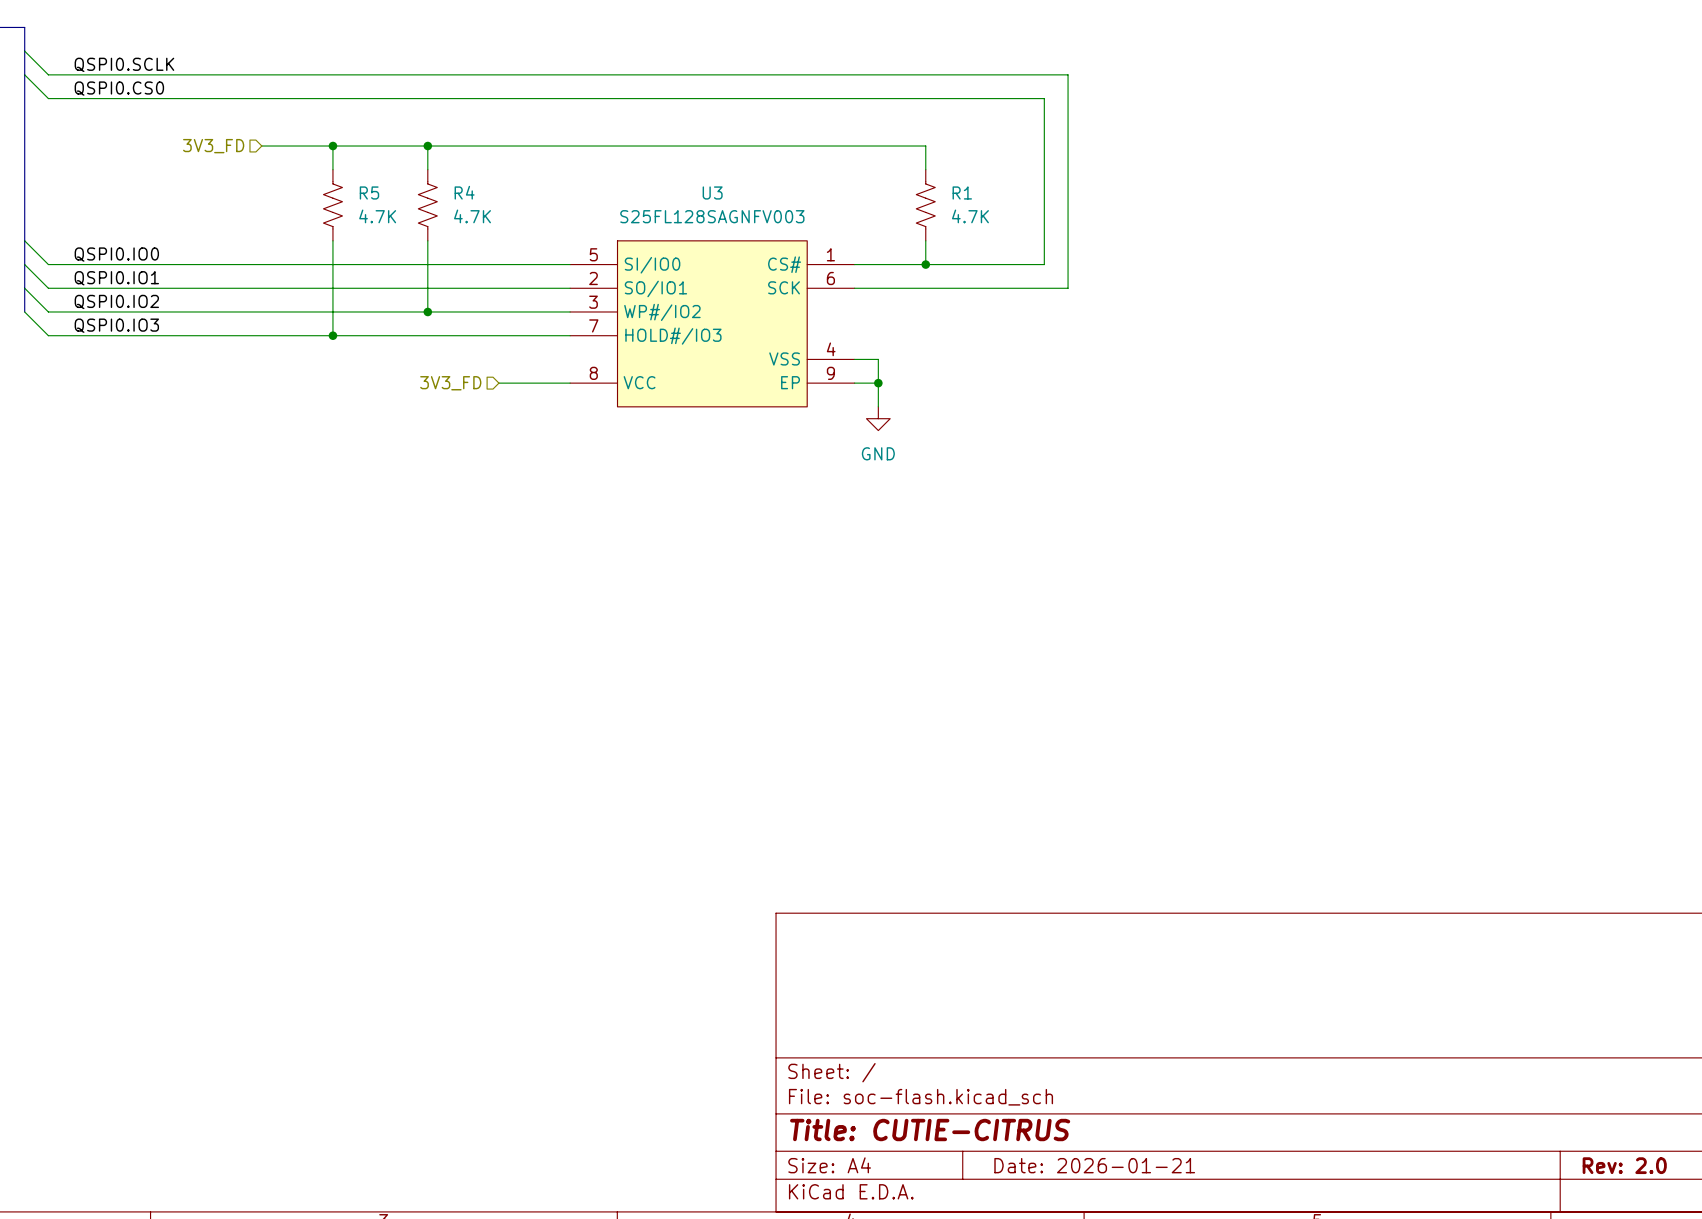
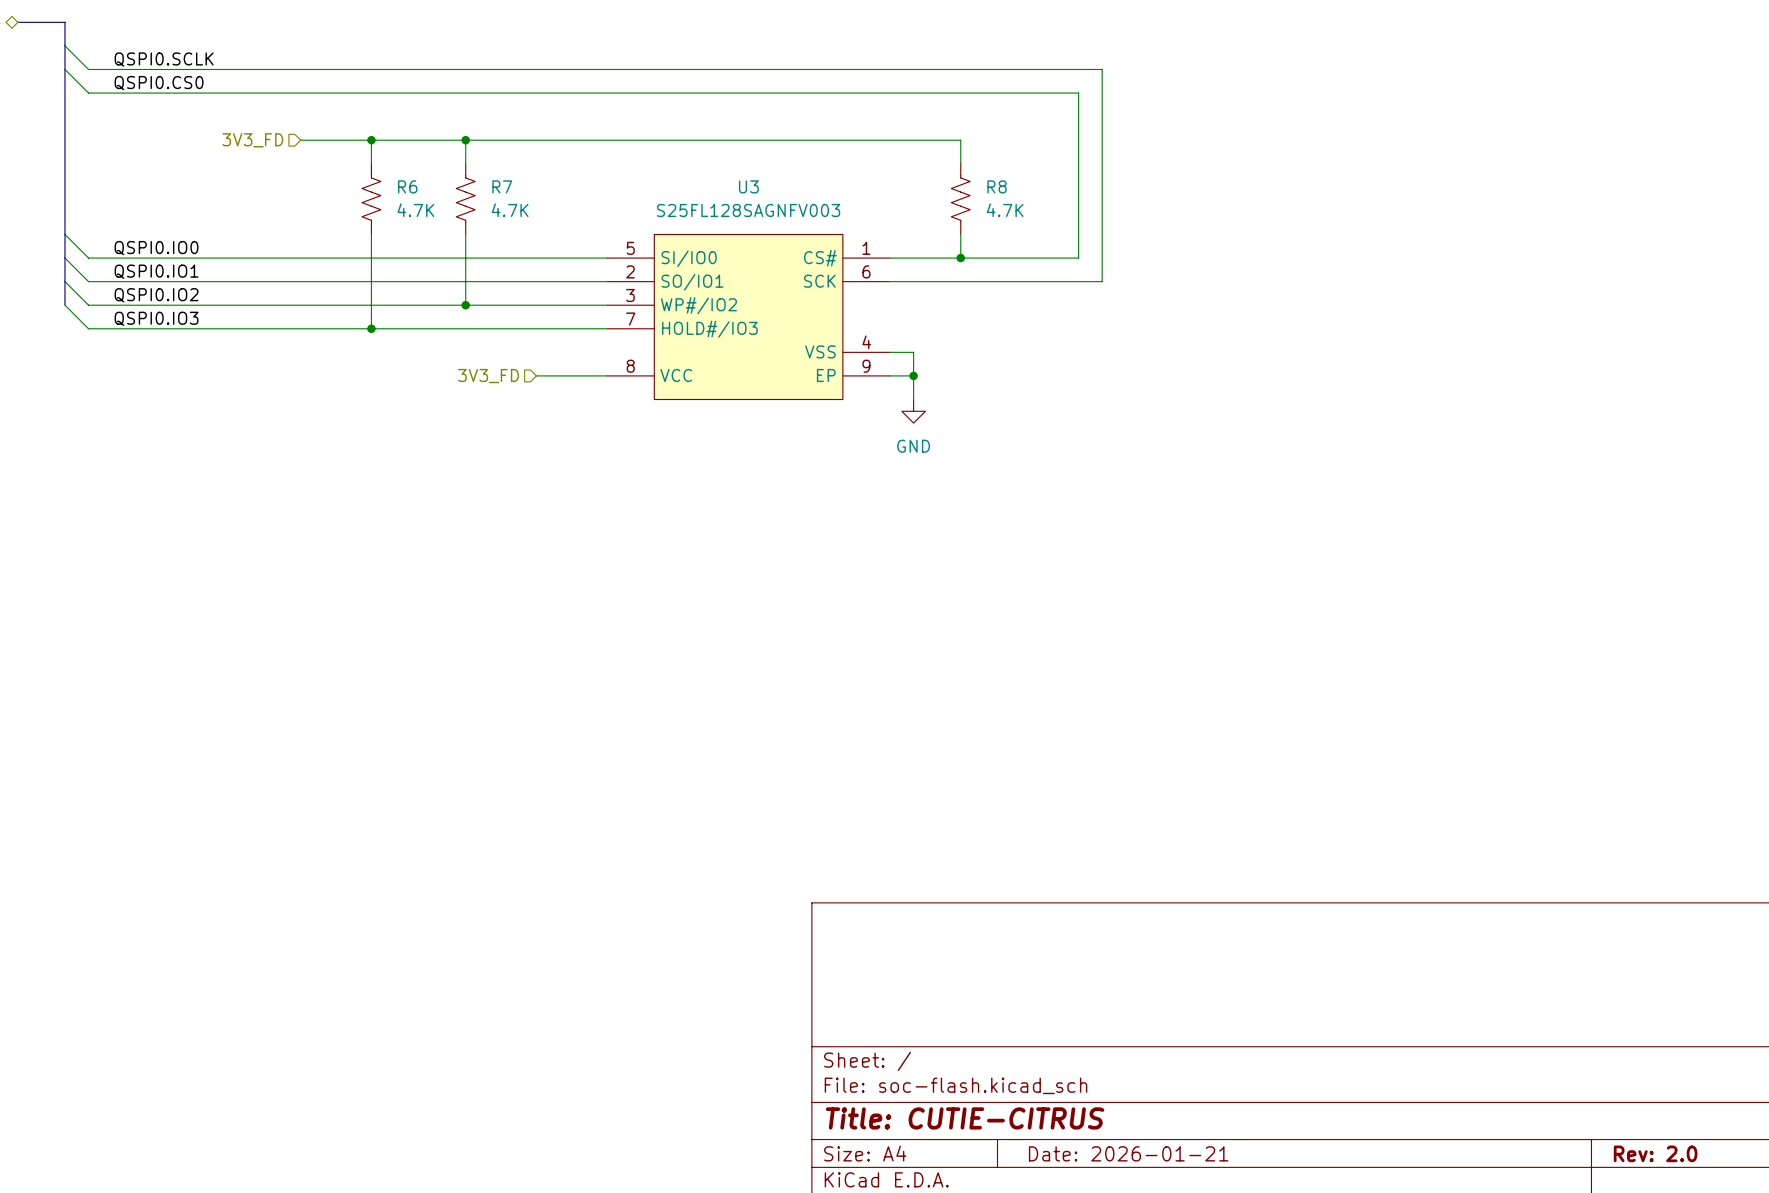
R5 name: R5 (369, 192) -> R6 (407, 186)
R4 name: R4 (464, 192) -> R7 (502, 186)
R1 name: R1 (962, 192) -> R8 (997, 186)

